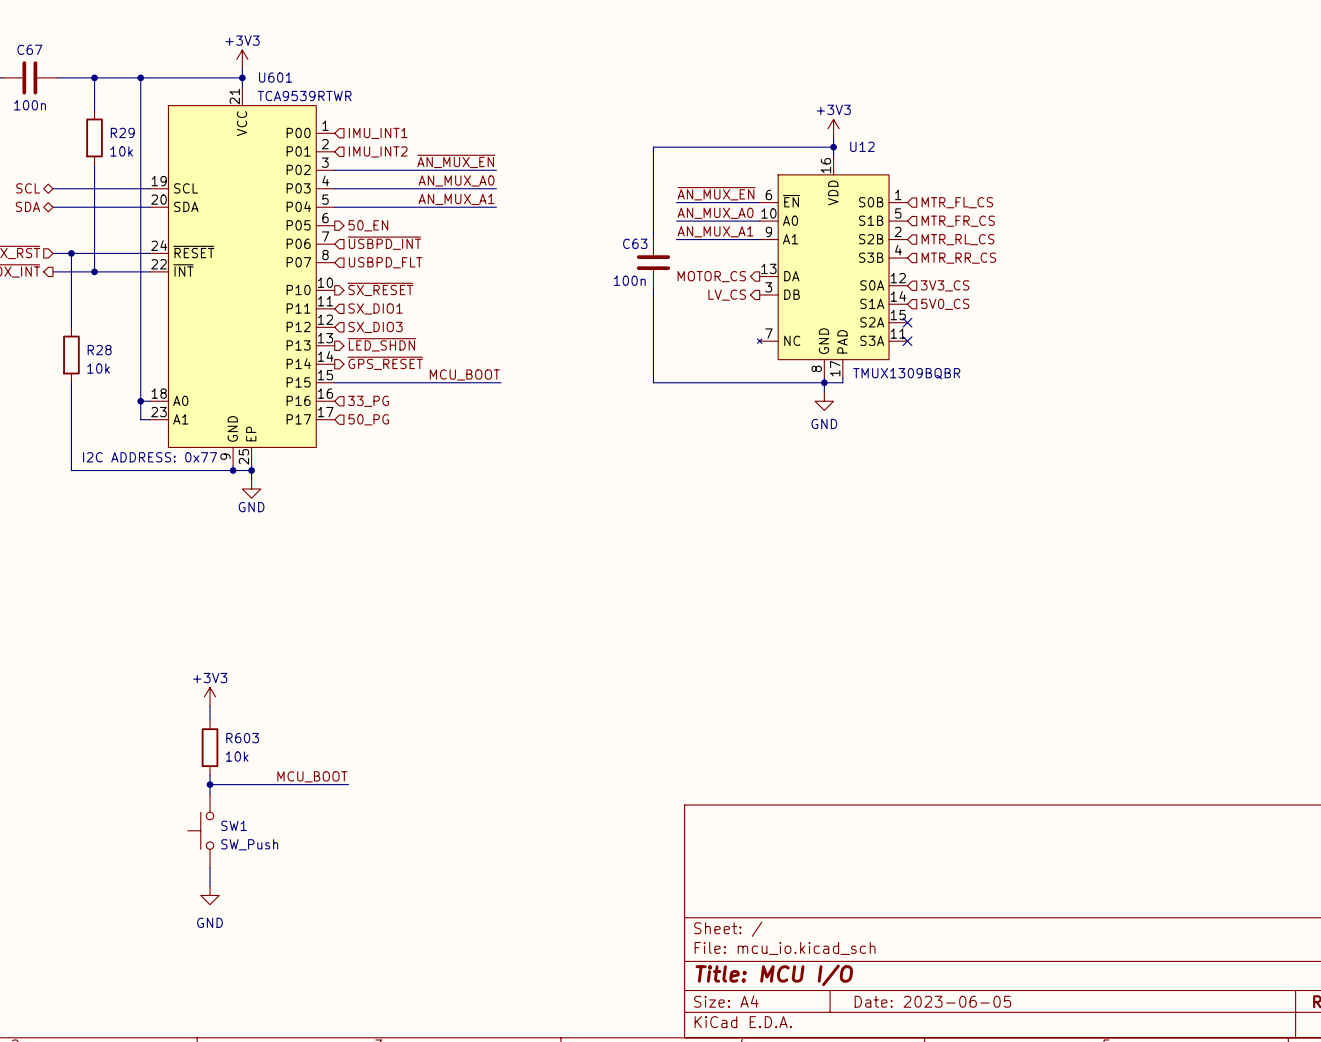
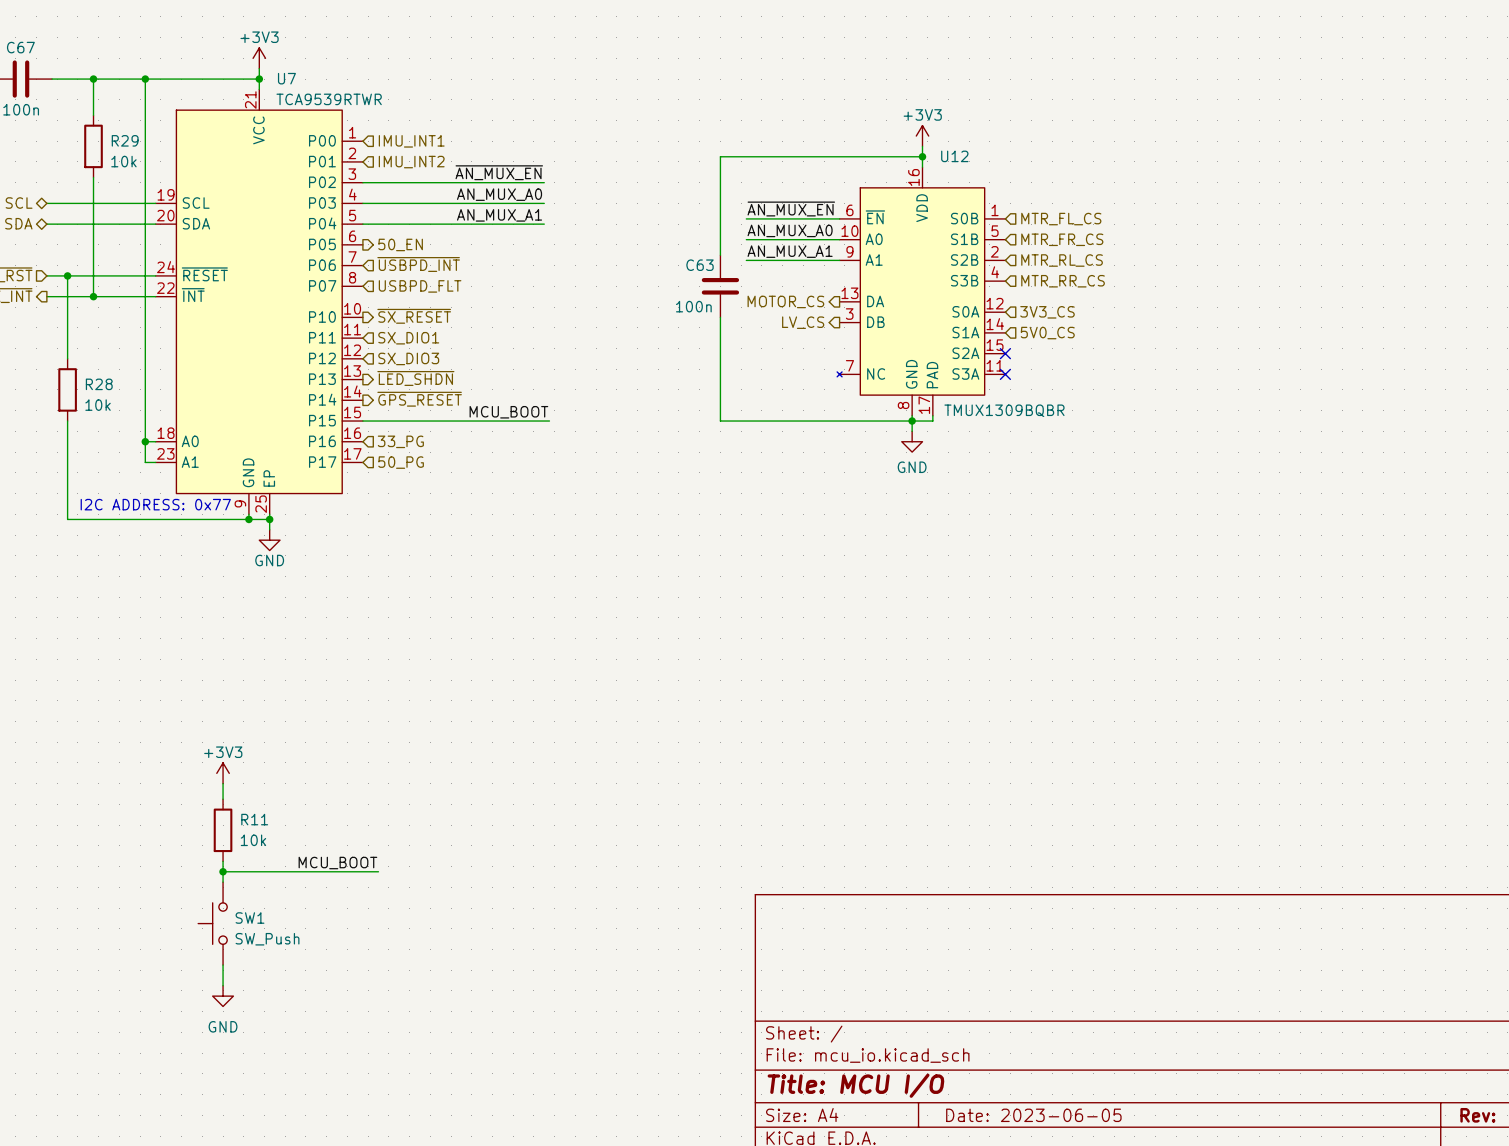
U601 name: U601 (275, 77) -> U7 (286, 78)
R603 name: R603 (242, 738) -> R11 (254, 819)

